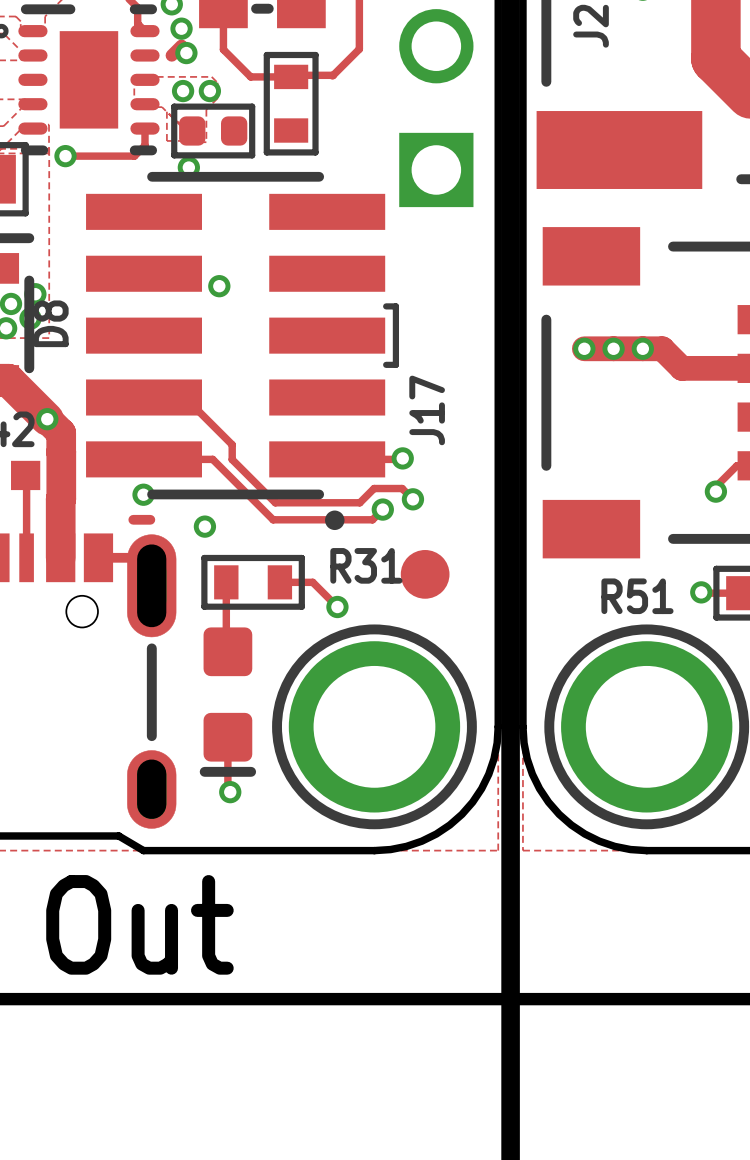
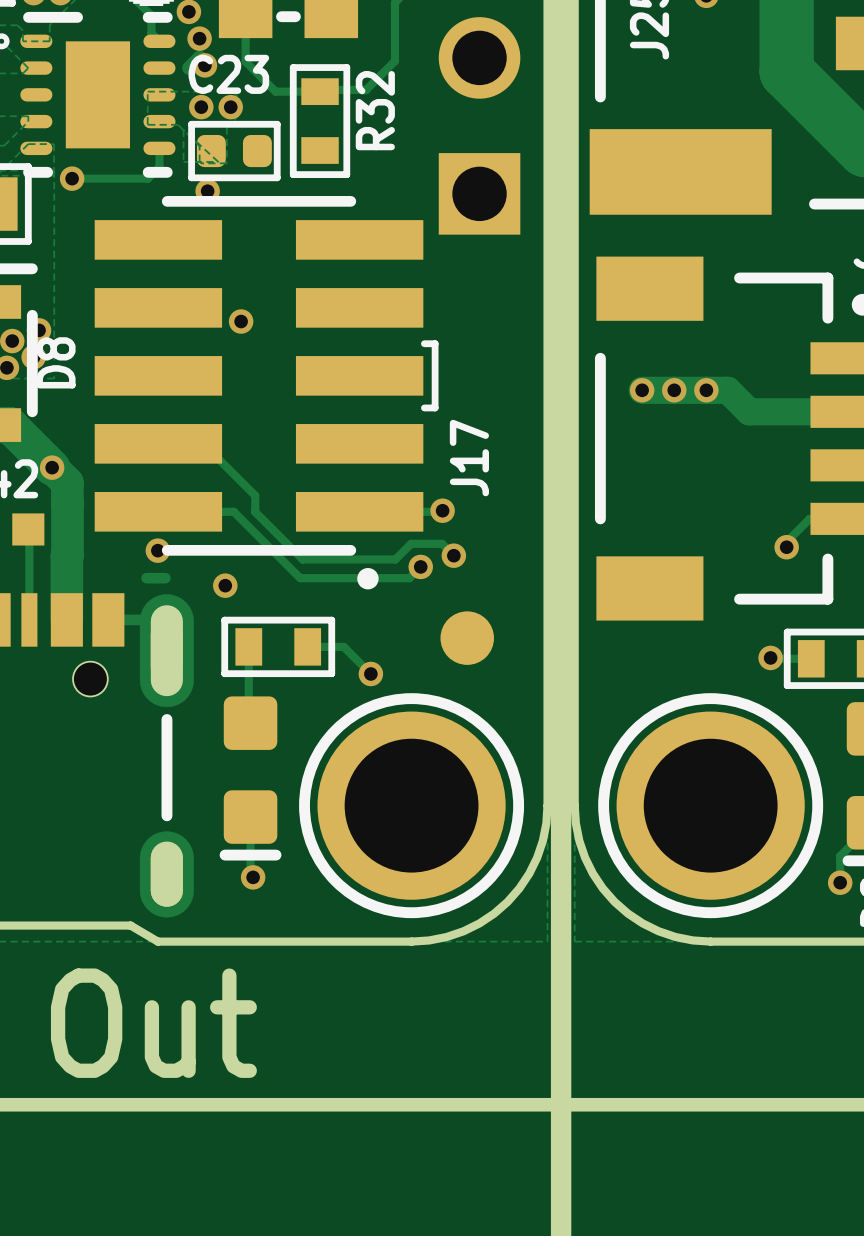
C23 name: none -> C23 (228, 74)
R32 name: none -> R32 (375, 110)
R31 name: R31 (366, 565) -> none
R51 name: R51 (637, 596) -> none

